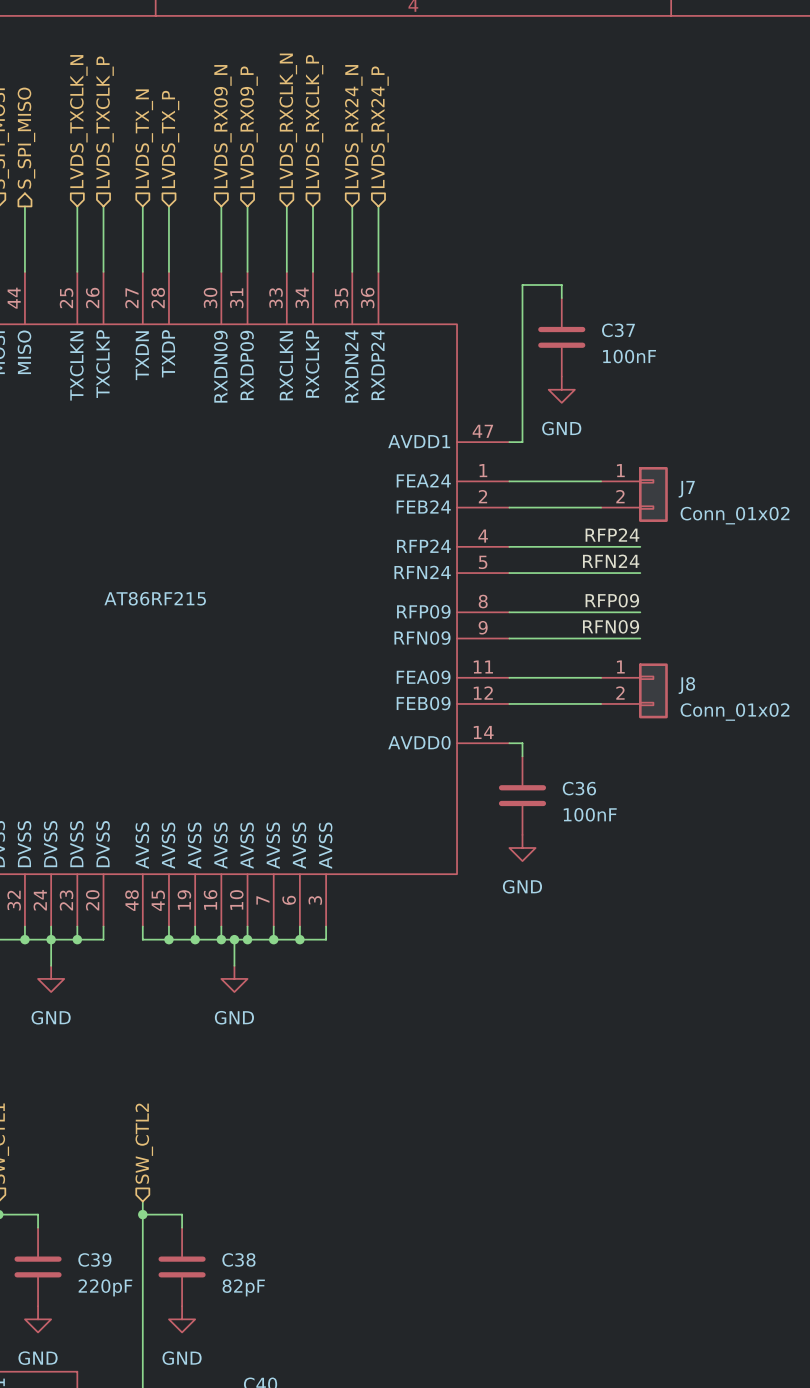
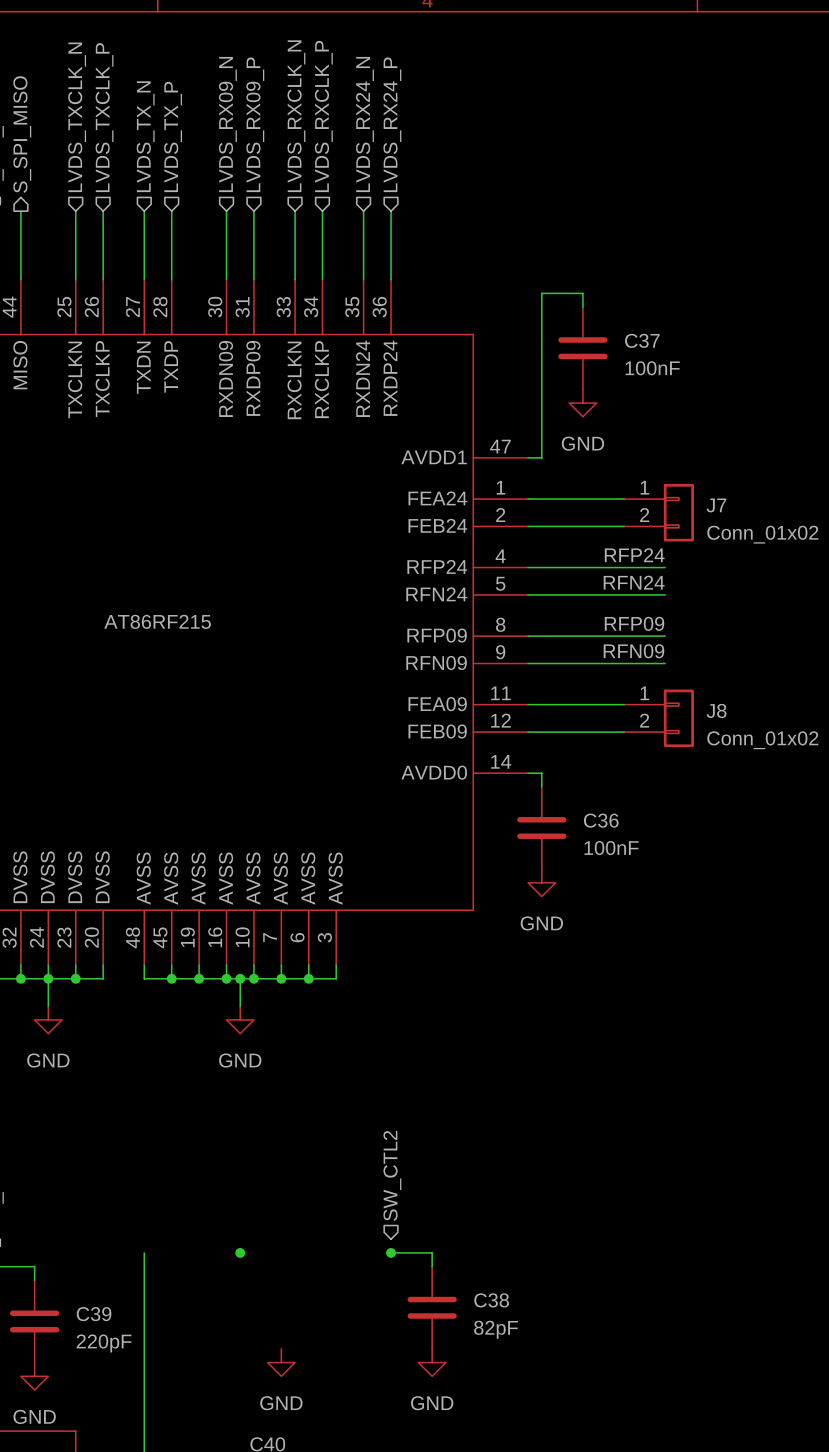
hierarchical label position: SW_CTL2 (144, 1143) -> SW_CTL2 (392, 1175)
junction: none -> (240, 1252)
junction: none -> (391, 1252)
wire: (142, 1214) (182, 1214) (182, 1227) -> (391, 1252) (432, 1252) (432, 1266)
junction: (142, 1214) -> none
C38 position: (182, 1266) -> (432, 1307)
power symbol: none -> GND (281, 1362)
power symbol: none -> GND (432, 1362)
power symbol: GND (182, 1319) -> none

